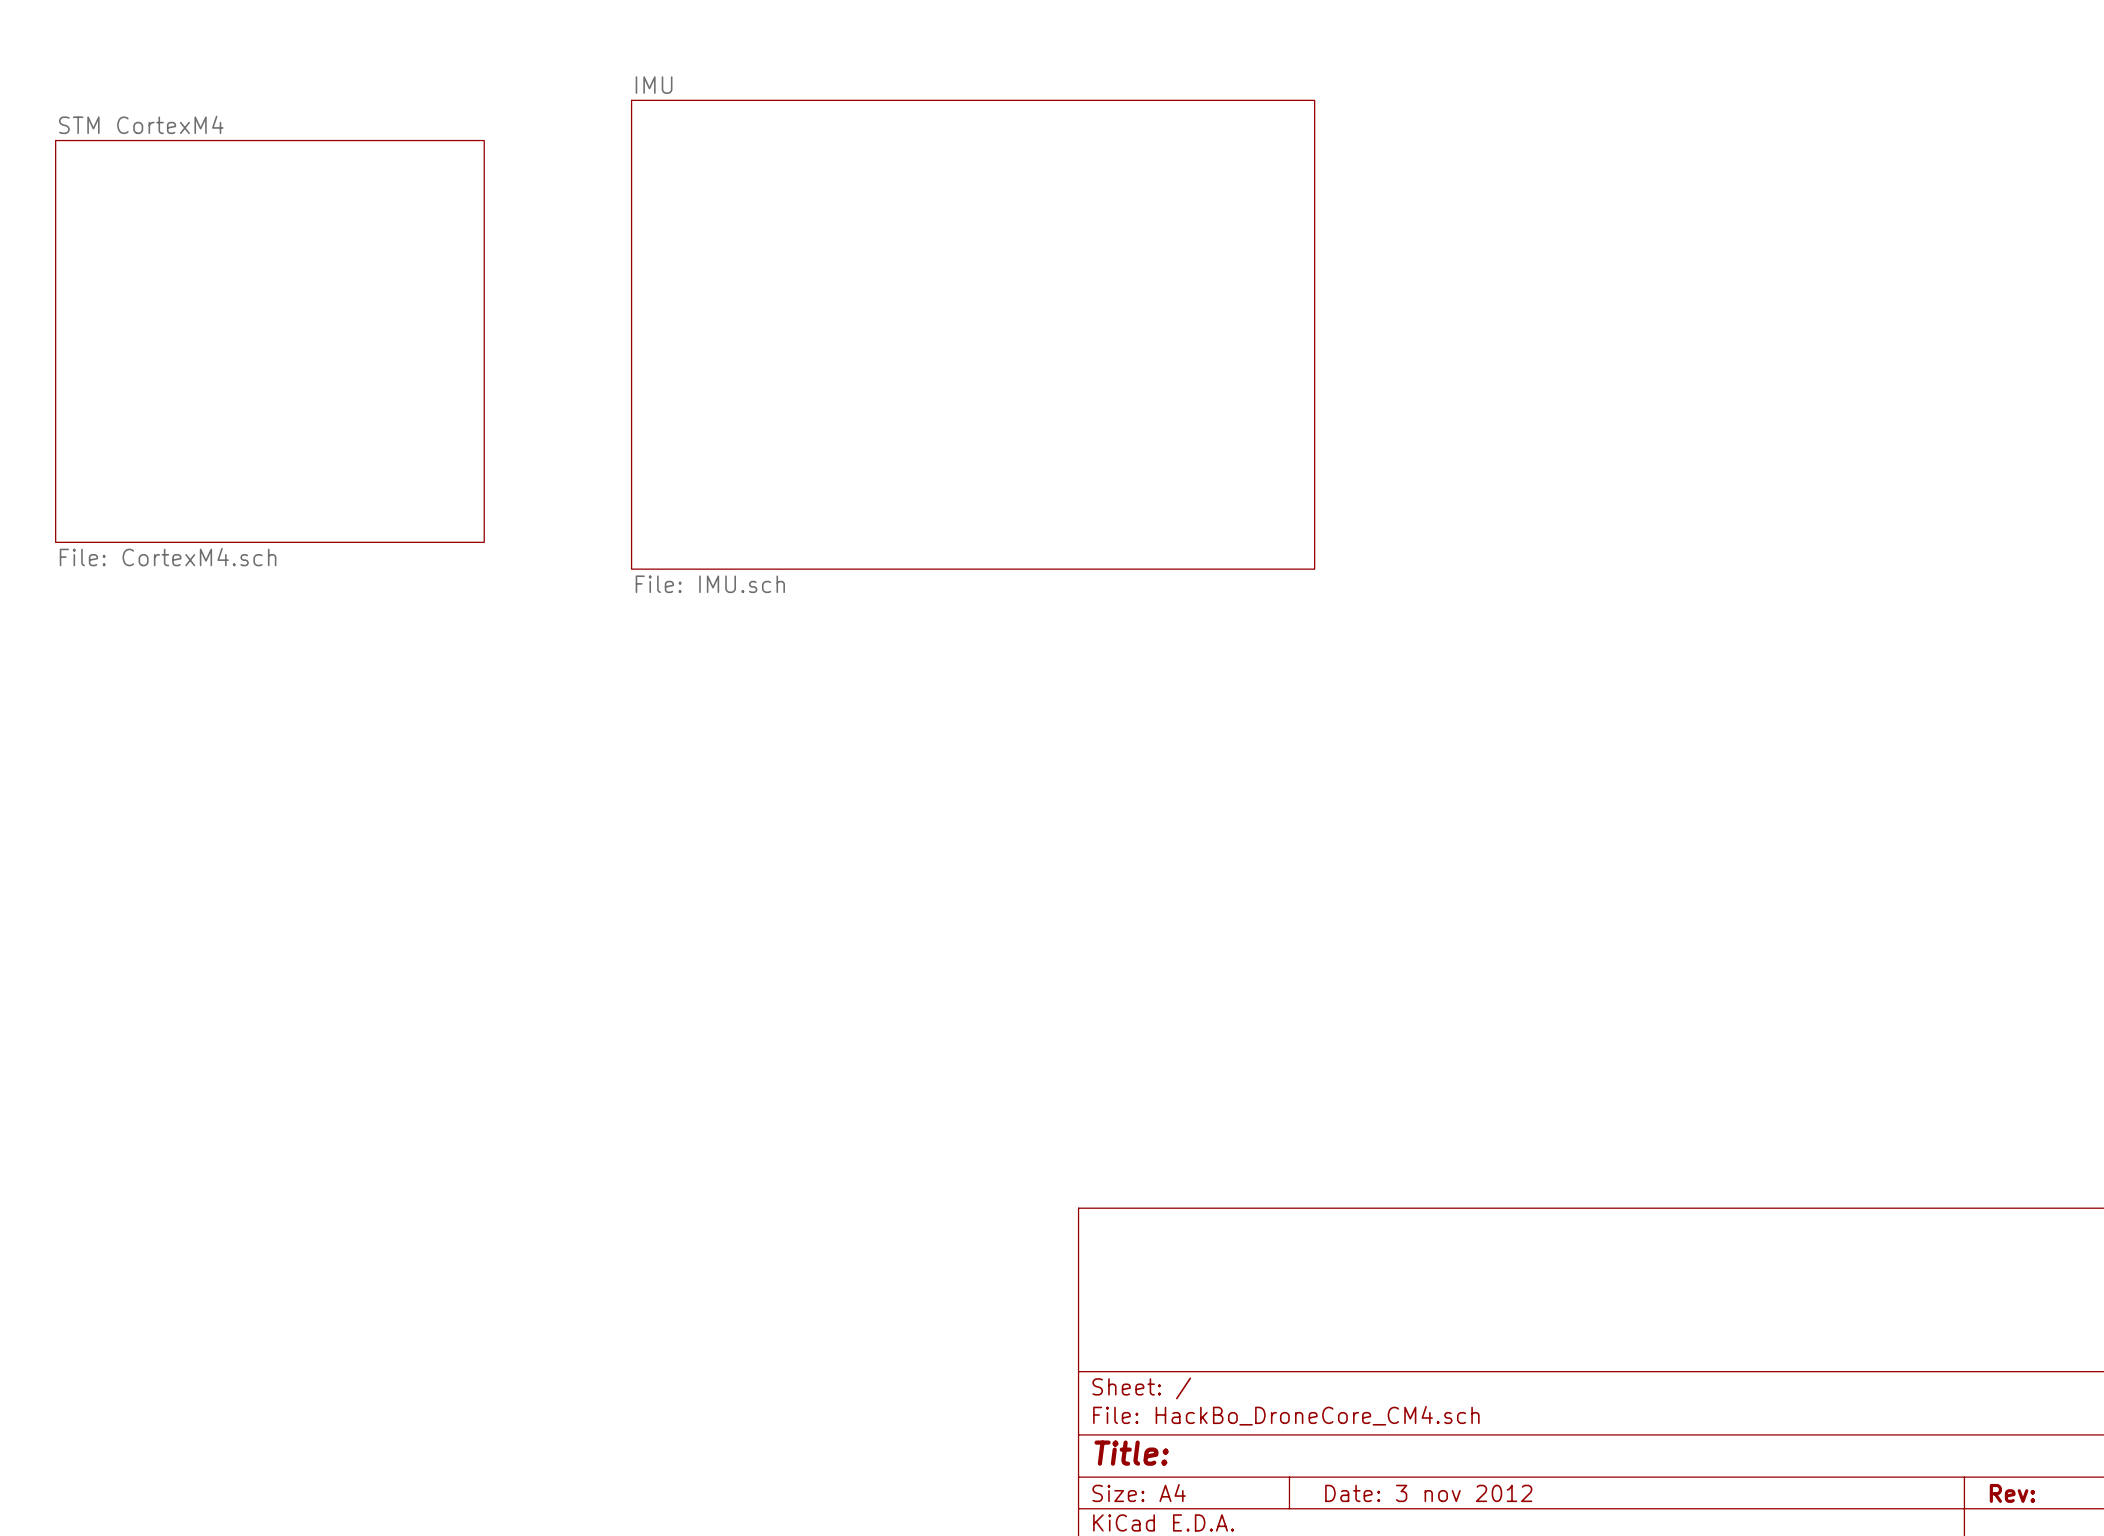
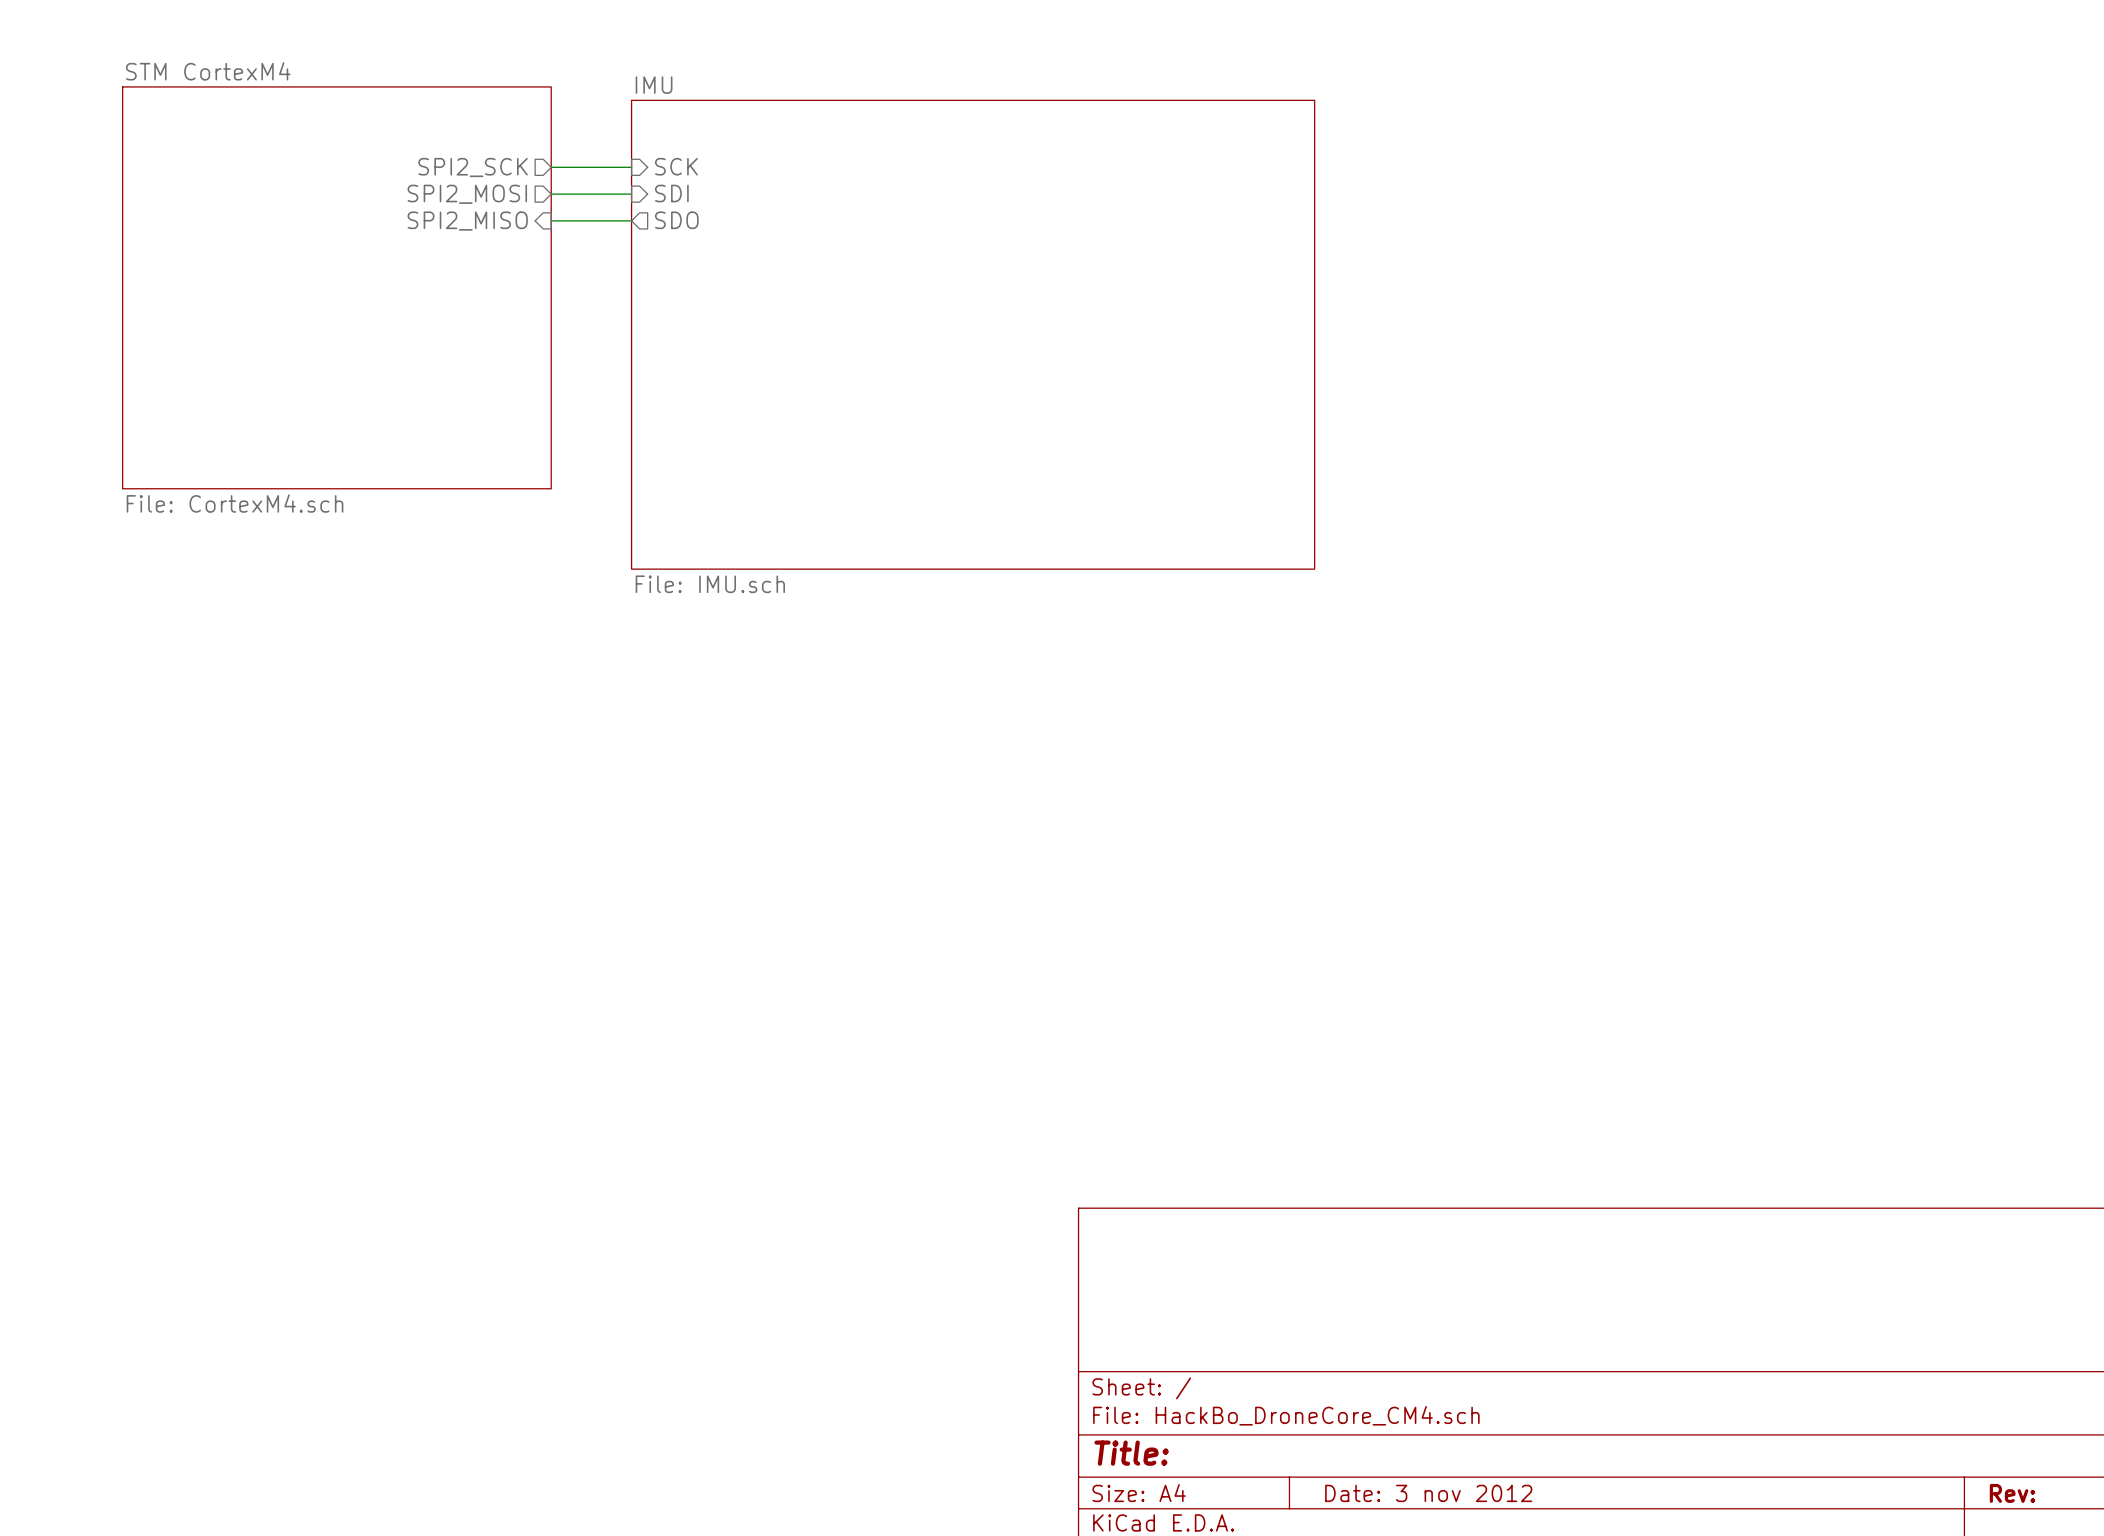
sheet pin: none -> SCK (676, 166)
sheet pin: none -> SPI2_SCK (473, 167)
wire: none -> (551, 167) (631, 167)
sheet pin: none -> SDI (671, 193)
sheet pin: none -> SPI2_MOSI (467, 194)
wire: none -> (551, 194) (631, 194)
wire: none -> (551, 220) (631, 220)
sheet pin: none -> SDO (676, 220)
sheet pin: none -> SPI2_MISO (467, 221)
sheet STM CortexM4 position: (269, 341) -> (336, 287)

